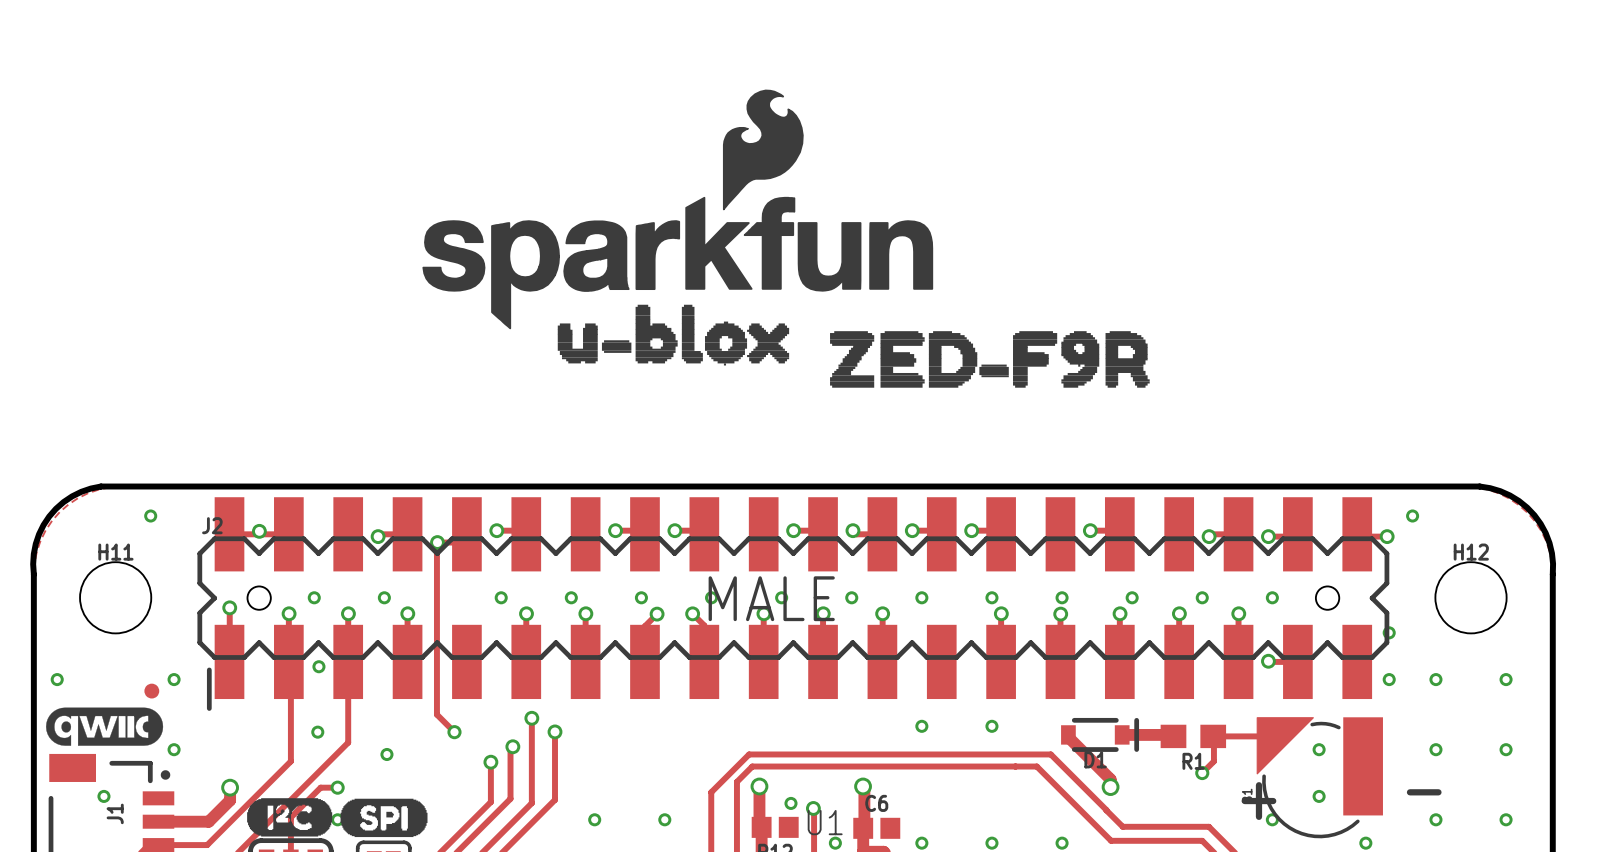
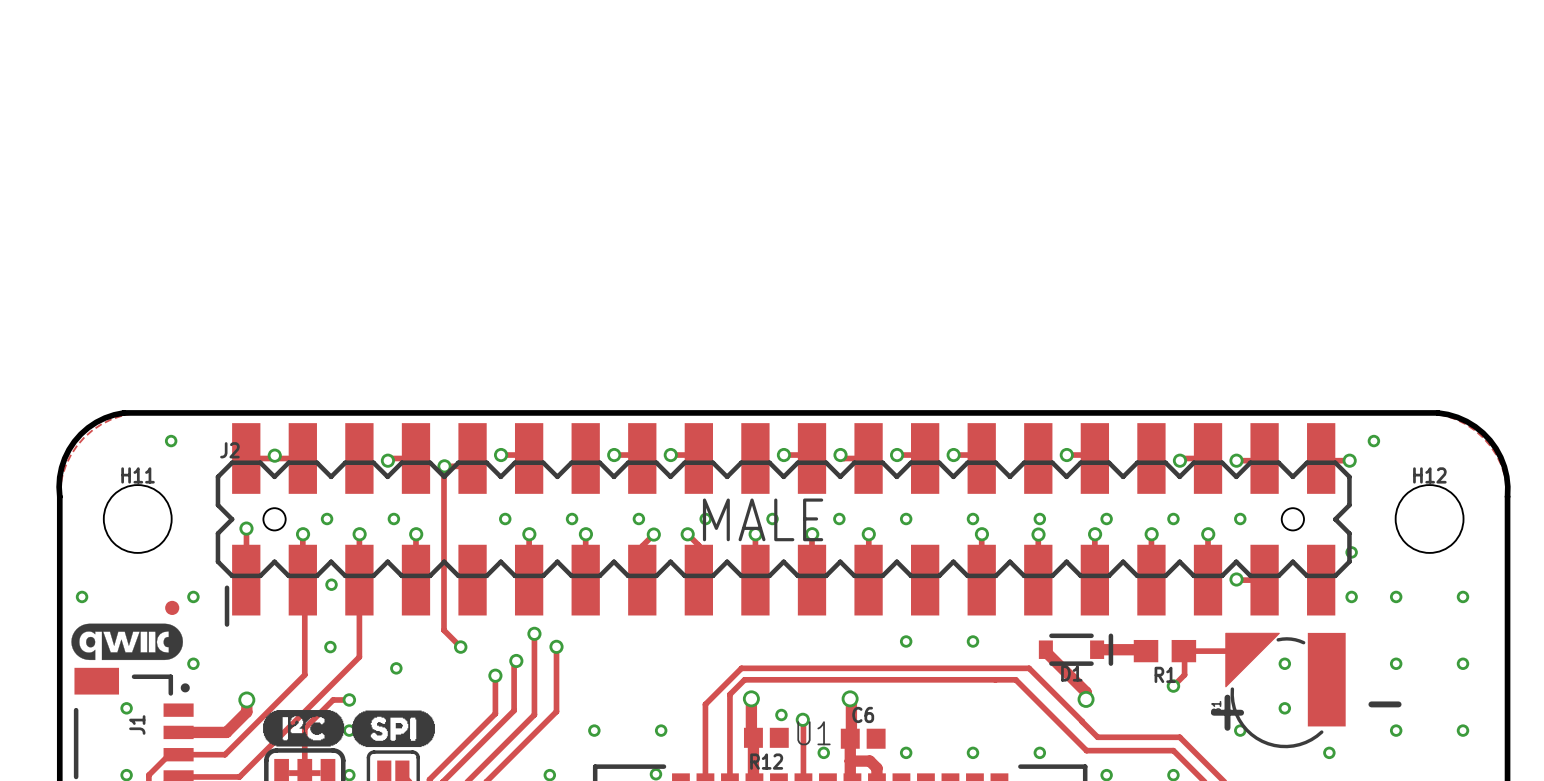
drawing: [422, 89, 1150, 388] -> none

